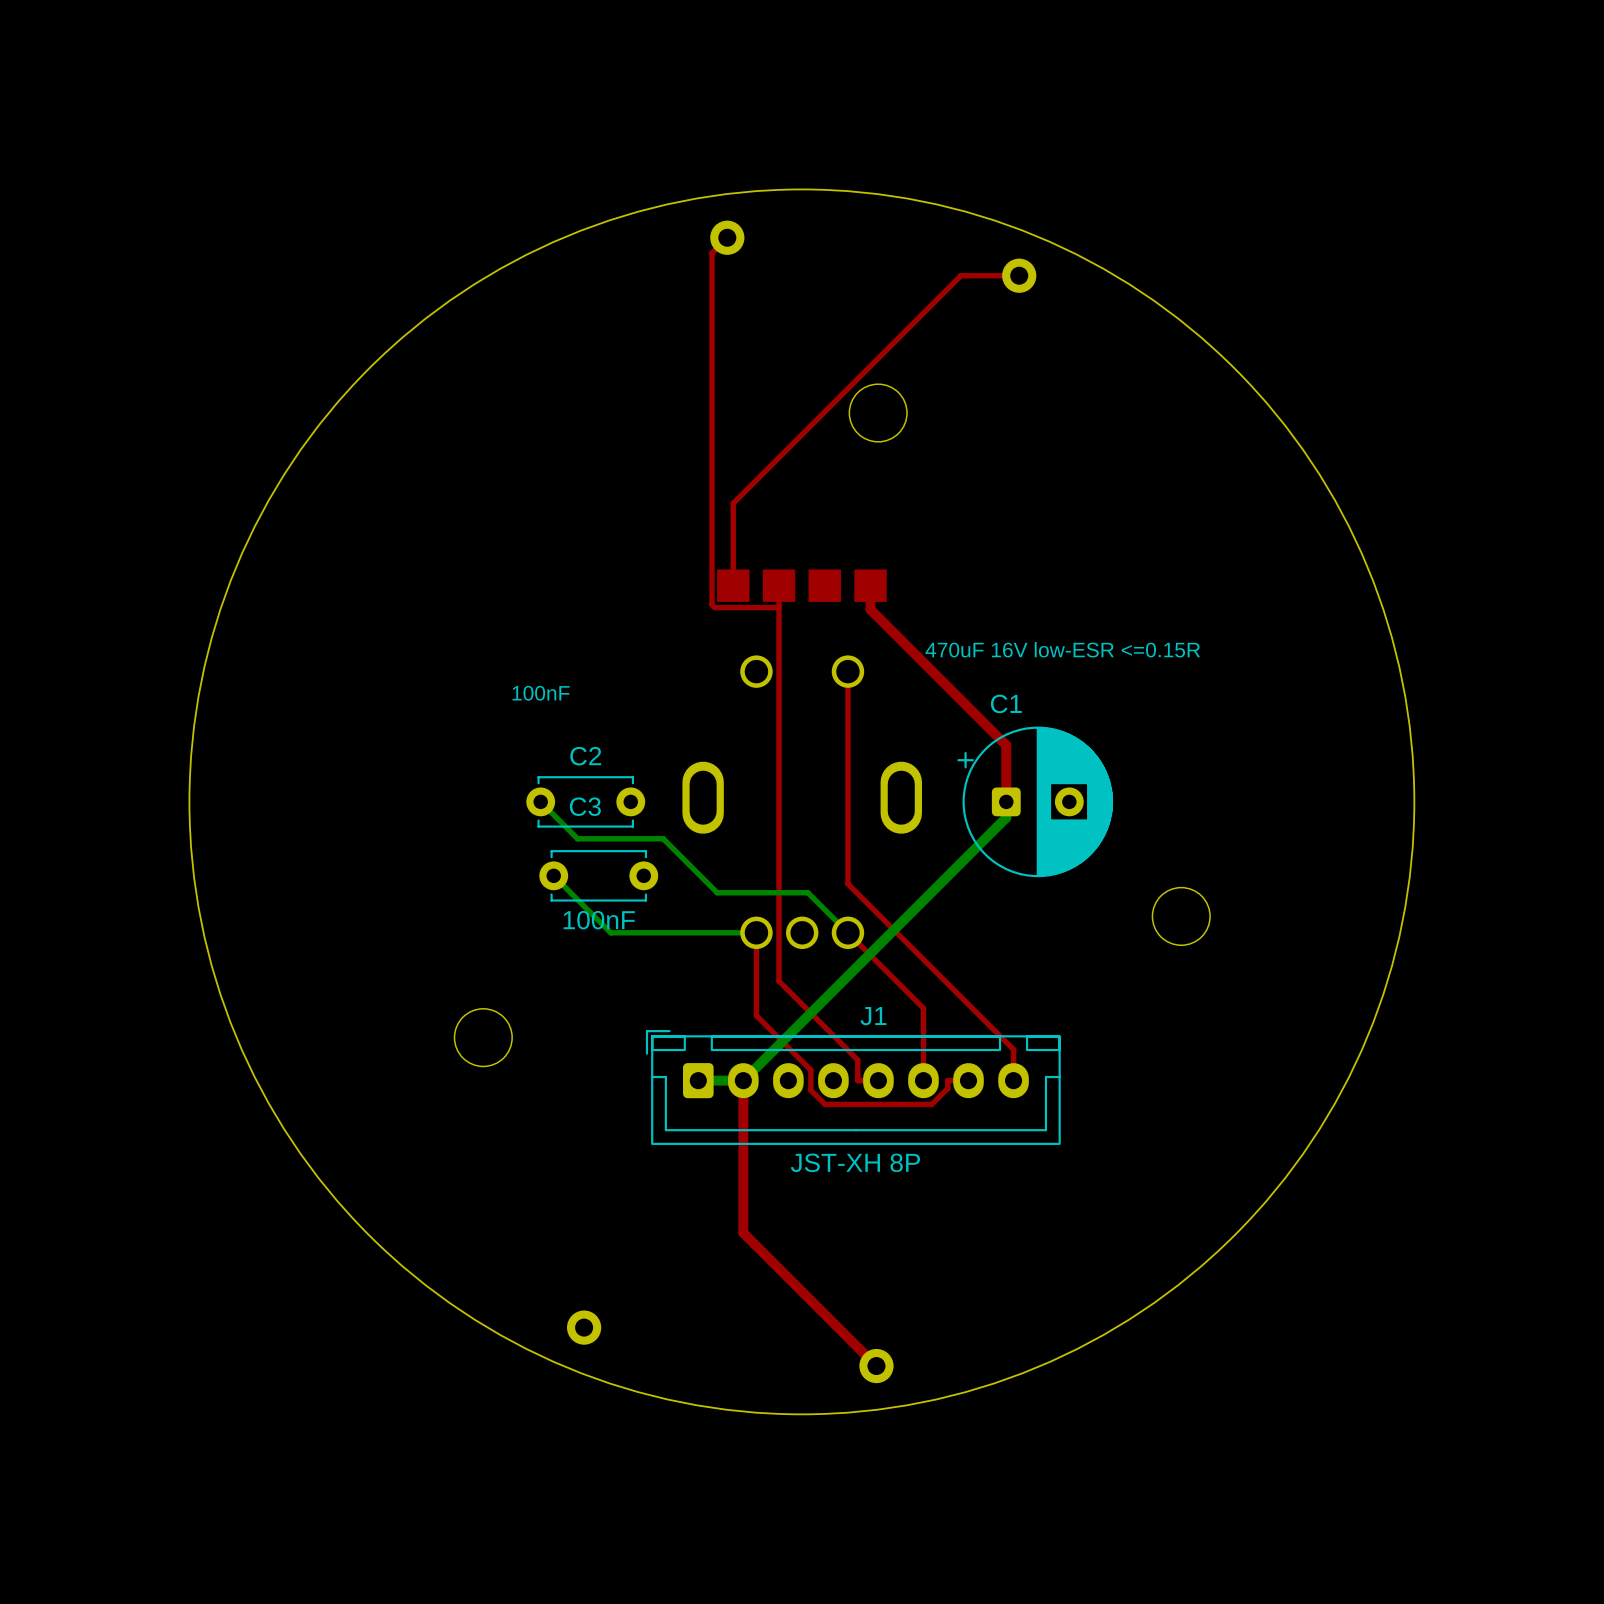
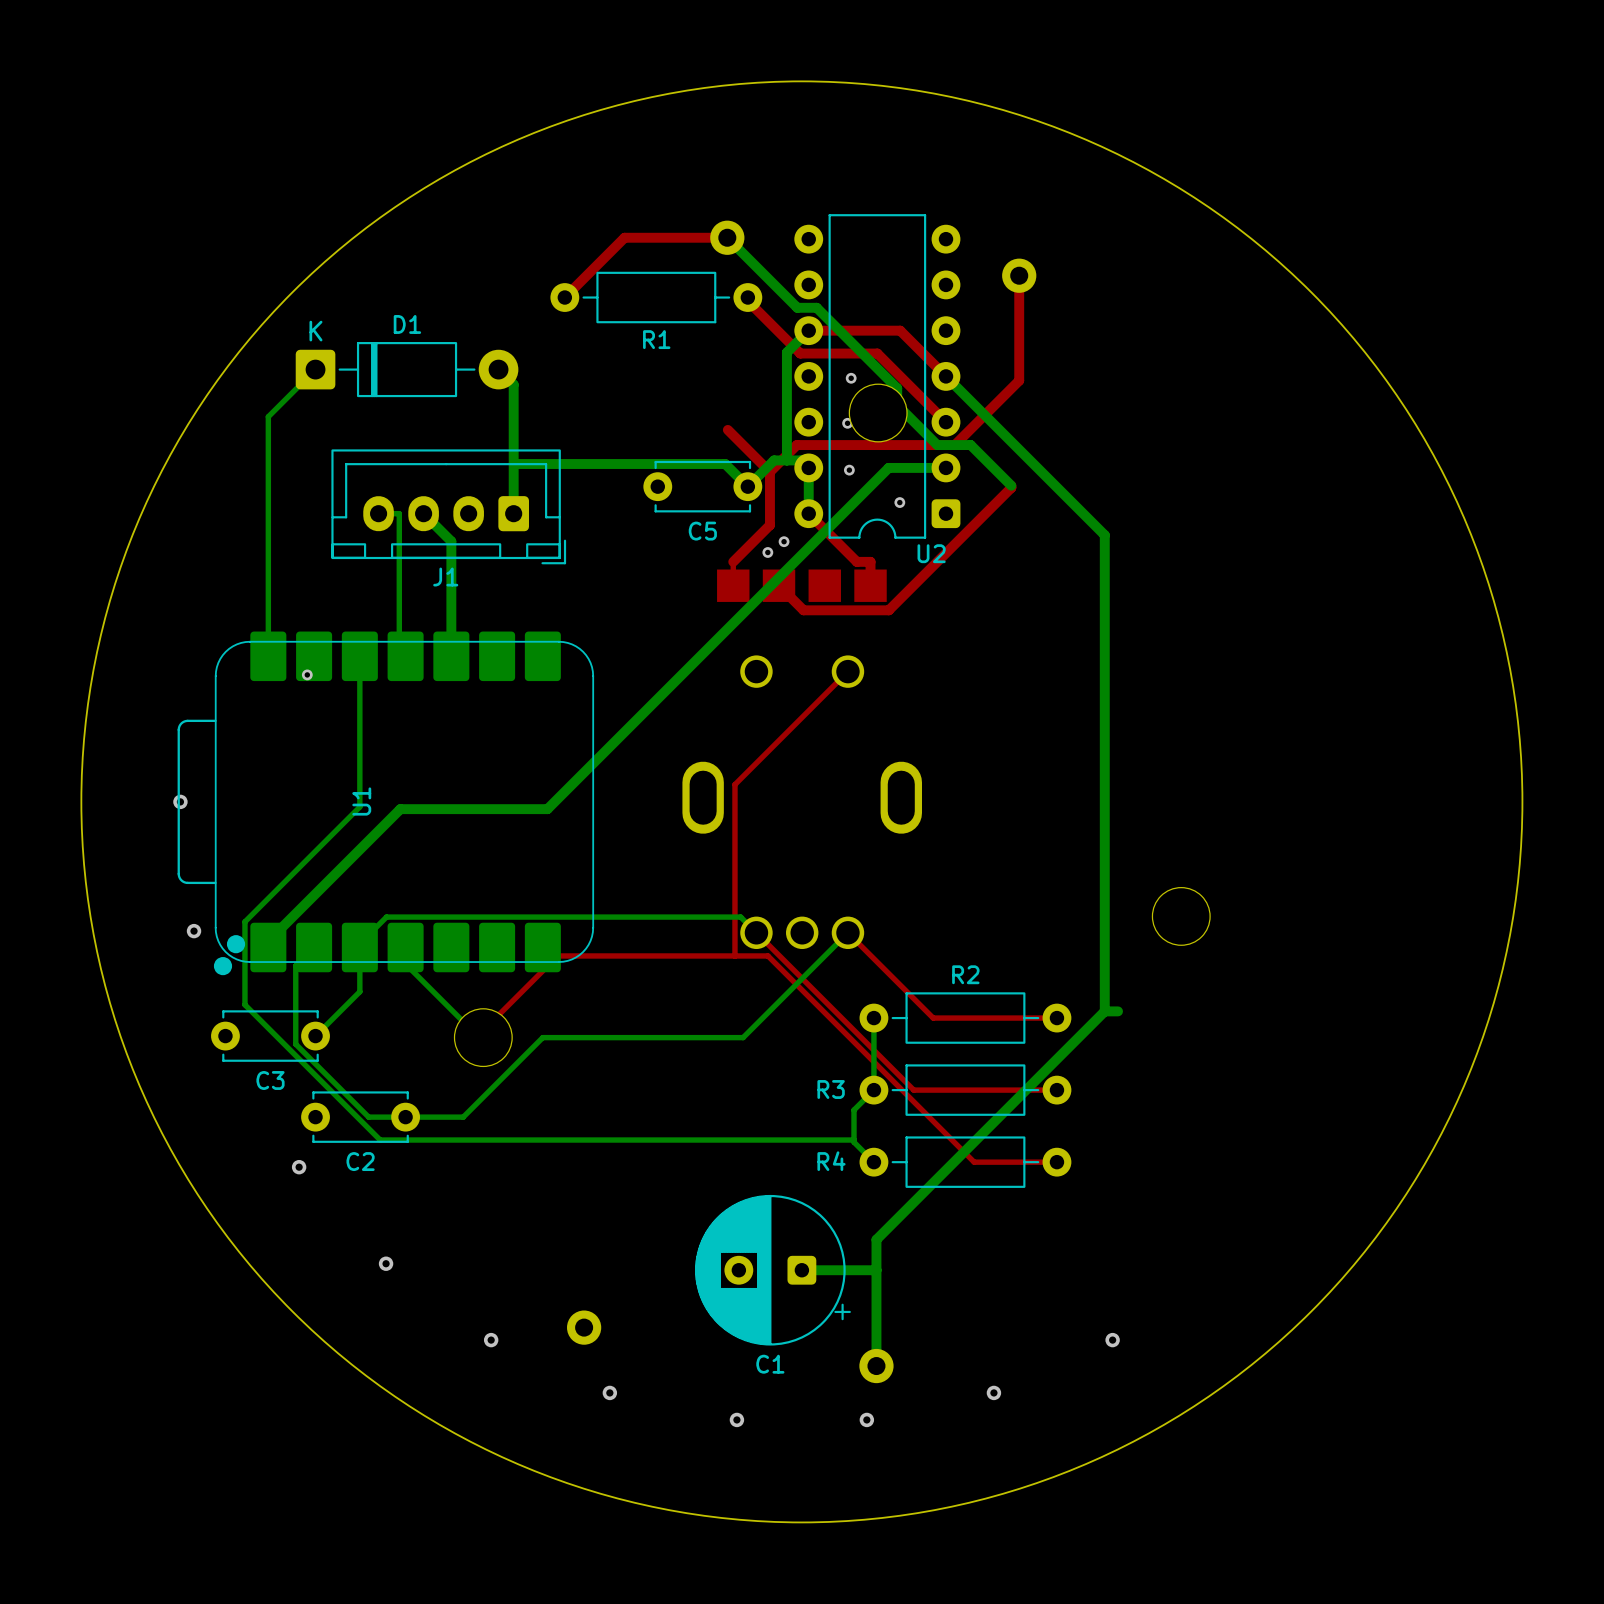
round board edge size: [188, 188, 1416, 1416] -> [80, 80, 1524, 1524]
top track: (727, 237) (711, 253) (711, 604) (714, 607) (779, 607) -> (727, 237) (624, 237) (564, 297)
bottom track: none -> (727, 237) (797, 307) (816, 307) (897, 388) (897, 404) (937, 445) (970, 445) (1011, 485)
top track: (1019, 275) (960, 275) (733, 503) (733, 561) -> (1019, 275) (1019, 380) (954, 445) (796, 445) (769, 472)
R1: none -> (656, 297)
top track: none -> (747, 297) (747, 301) (800, 353) (877, 353) (946, 422)
top track: none -> (808, 330) (900, 330) (946, 376)
bottom track: none -> (808, 330) (786, 352) (786, 460)
bottom track: none -> (315, 369) (268, 416) (268, 656)
D1: none -> (407, 369)
bottom track: none -> (498, 369) (513, 384) (513, 513)
U2: none -> (877, 376)
bottom track: none -> (946, 376) (1104, 535) (1104, 1011)
via: none -> (851, 378)
via: none -> (847, 423)
top track: none -> (727, 429) (769, 472)
bottom track: none -> (513, 464) (725, 464) (747, 486) (774, 460) (801, 460) (808, 467) (808, 513)
bottom track: none -> (946, 467) (888, 467) (547, 809) (400, 809) (268, 941) (268, 947)
via: none -> (849, 470)
top track: none -> (769, 472) (769, 525) (733, 561)
C5: none -> (702, 486)
via: none -> (899, 502)
bottom track: none -> (378, 513) (399, 513) (399, 649) (405, 656)
bottom track: none -> (423, 513) (451, 541) (451, 656)
via: none -> (784, 541)
via: none -> (767, 552)
top track: (779, 585) (779, 981) (857, 1059) (857, 1080) (878, 1080) -> (779, 585) (803, 610) (888, 610) (1011, 485)
top track: (870, 585) (870, 609) (1006, 745) (1006, 801) -> (870, 585) (870, 561) (856, 561) (808, 513)
C1 value: 470uF 16V low-ESR <=0.15R (1062, 649) -> none
bottom track: none -> (359, 656) (359, 806) (244, 921) (244, 1004) (380, 1140) (853, 1140)
top track: (847, 671) (847, 883) (1013, 1049) (1013, 1080) -> (847, 671) (734, 784) (734, 955)
via: none -> (307, 674)
C2 value: 100nF (541, 693) -> none
C2 name position: C2 (585, 756) -> C2 (360, 1161)
via: none -> (180, 801)
bottom track: (540, 801) (577, 838) (663, 838) (717, 892) (807, 892) (847, 932) -> (314, 947) (295, 965) (295, 1044) (368, 1117) (463, 1117) (542, 1037) (743, 1037) (847, 932)
C2 position: (585, 801) -> (360, 1117)
bottom track: (1006, 801) (1006, 817) (743, 1080) (698, 1080) -> none
C1 rotation: 0° (1035, 801) -> 180° (772, 1270)
C1 position: (1035, 801) -> (772, 1270)
U1: none -> (385, 803)
C3 name position: C3 (585, 806) -> C3 (270, 1080)
bottom track: (553, 875) (610, 932) (756, 932) -> (315, 1036) (359, 991) (359, 943) (386, 917) (740, 917) (756, 932)
C3 position: (598, 875) -> (270, 1036)
C3 value: 100nF (599, 920) -> none
via: none -> (194, 931)
top track: (756, 932) (756, 1015) (810, 1070) (810, 1090) (825, 1104) (931, 1104) (947, 1088) (947, 1080) (968, 1080) -> (756, 932) (913, 1090) (1056, 1090)
bottom track: none -> (405, 947) (405, 964) (477, 1036)
top track: (923, 1008) (923, 1080) -> (923, 1008) (933, 1018) (1056, 1018)
bottom track: none -> (1104, 1011) (876, 1239) (876, 1366)
bottom track: none -> (1118, 1011) (1104, 1011)
J1 name position: J1 (873, 1016) -> J1 (445, 577)
bottom track: none -> (873, 1018) (873, 1090) (853, 1110) (853, 1142) (873, 1162)
R2: none -> (965, 1018)
J1 footprint: [645, 1030, 1061, 1145] -> [331, 449, 567, 565]
top track: none -> (477, 1036) (557, 955) (768, 955) (974, 1162) (1056, 1162)
top track: (743, 1080) (743, 1232) (876, 1366) -> none
R3: none -> (965, 1090)
J1 value: JST-XH 8P (855, 1162) -> none
R4: none -> (965, 1162)
via: none -> (299, 1167)
via: none -> (386, 1263)
bottom track: none -> (876, 1270) (801, 1270)
via: none -> (491, 1340)
via: none -> (1112, 1340)
via: none -> (609, 1392)
via: none -> (993, 1392)
via: none -> (736, 1419)
via: none -> (866, 1419)

